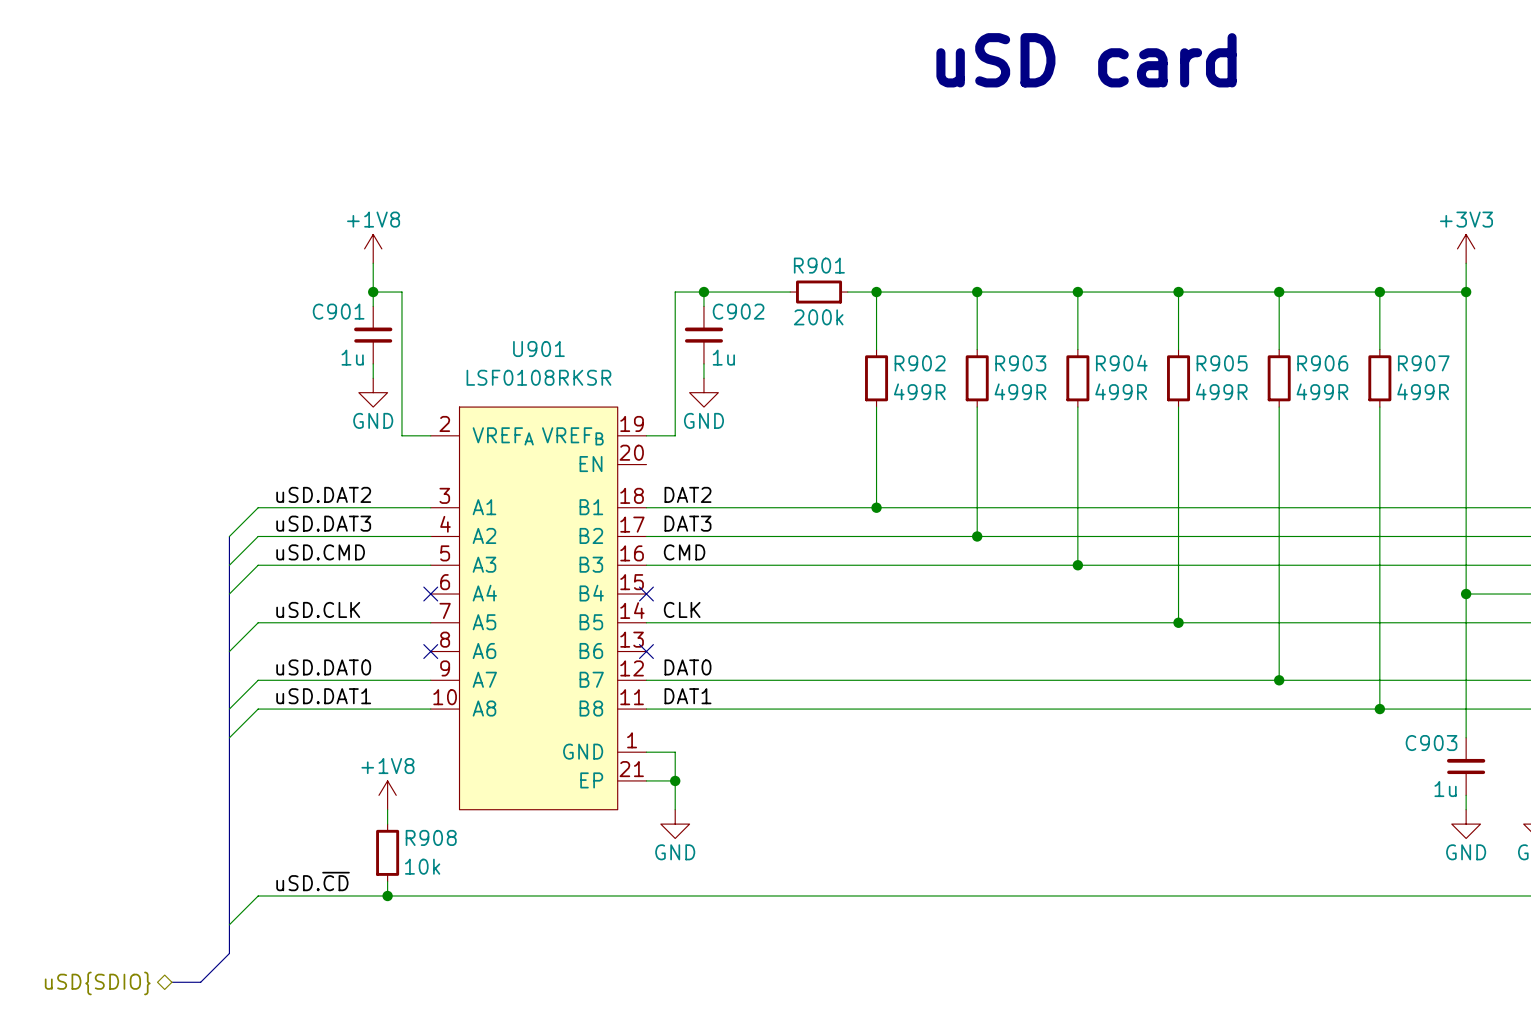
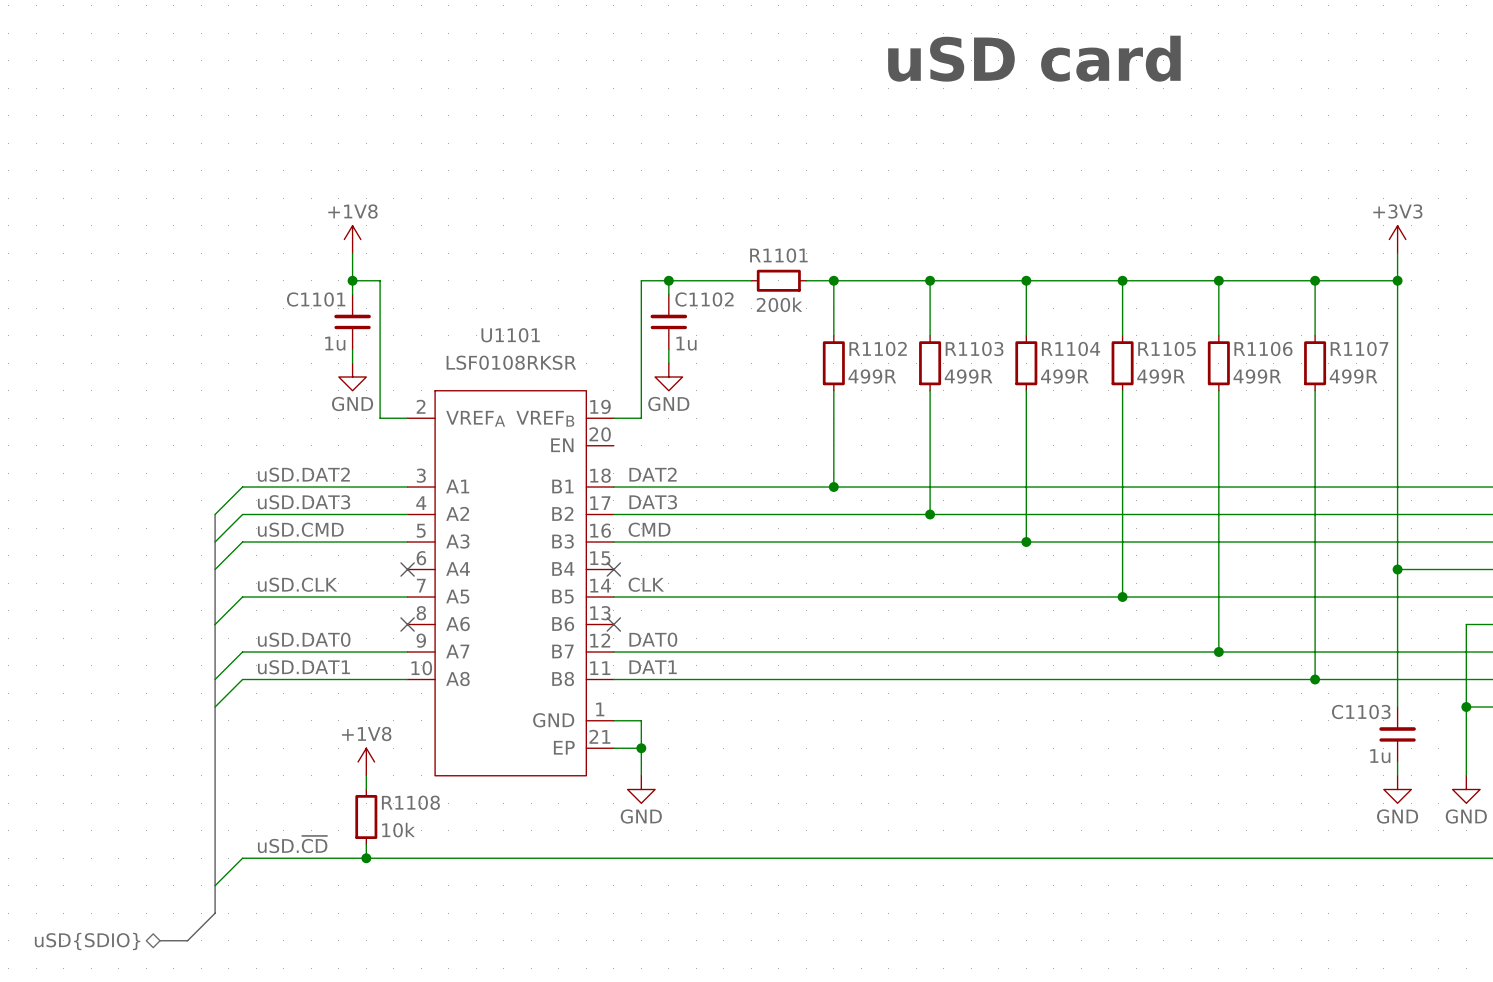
R901 name: R901 (819, 265) -> R1101 (778, 255)
C901 name: C901 (338, 311) -> C1101 (316, 299)
C902 name: C902 (738, 311) -> C1102 (704, 299)
U901 name: U901 (538, 349) -> U1101 (510, 335)
R902 name: R902 (920, 363) -> R1102 (878, 349)
R903 name: R903 (1020, 363) -> R1103 (974, 349)
R904 name: R904 (1121, 363) -> R1104 (1071, 349)
R905 name: R905 (1222, 363) -> R1105 (1166, 349)
R906 name: R906 (1322, 363) -> R1106 (1263, 349)
R907 name: R907 (1423, 363) -> R1107 (1359, 349)
C903 name: C903 (1431, 743) -> C1103 (1361, 712)
R908 name: R908 (431, 837) -> R1108 (410, 802)

